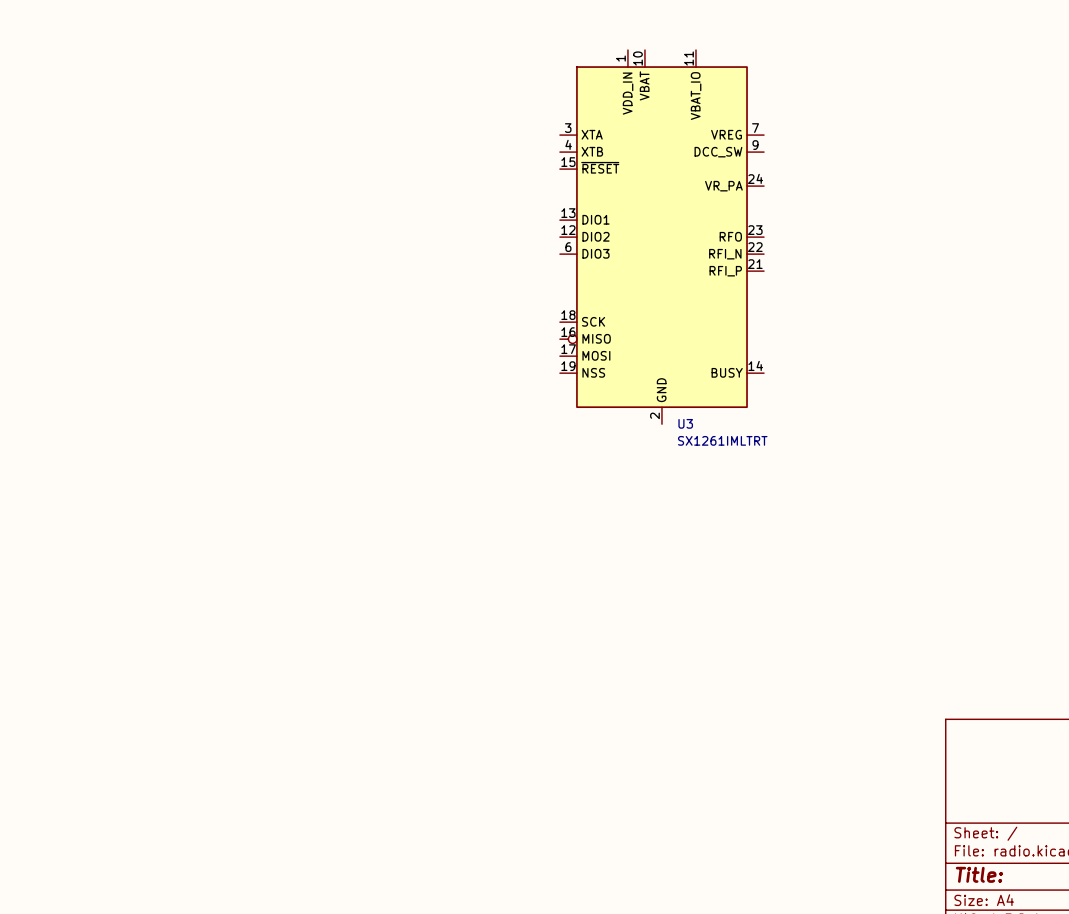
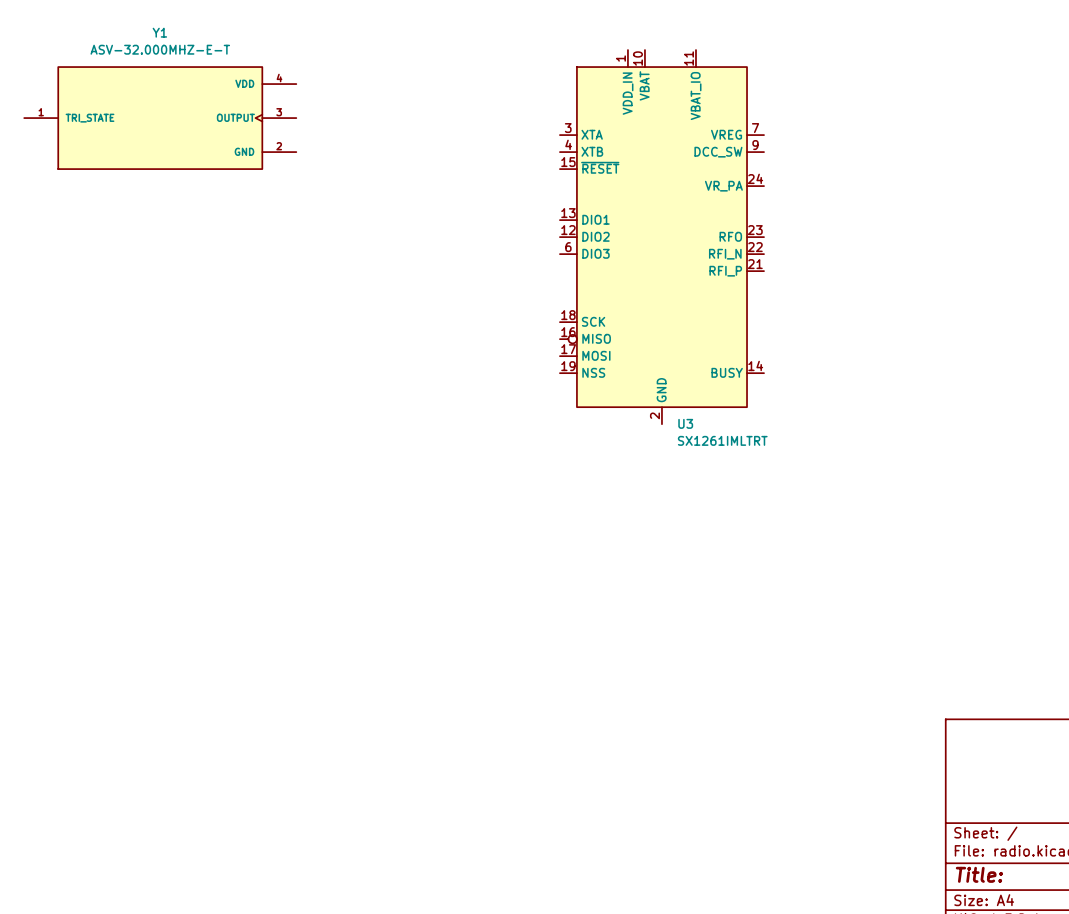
Y1: none -> ASV-32.000MHZ-E-T (160, 118)

